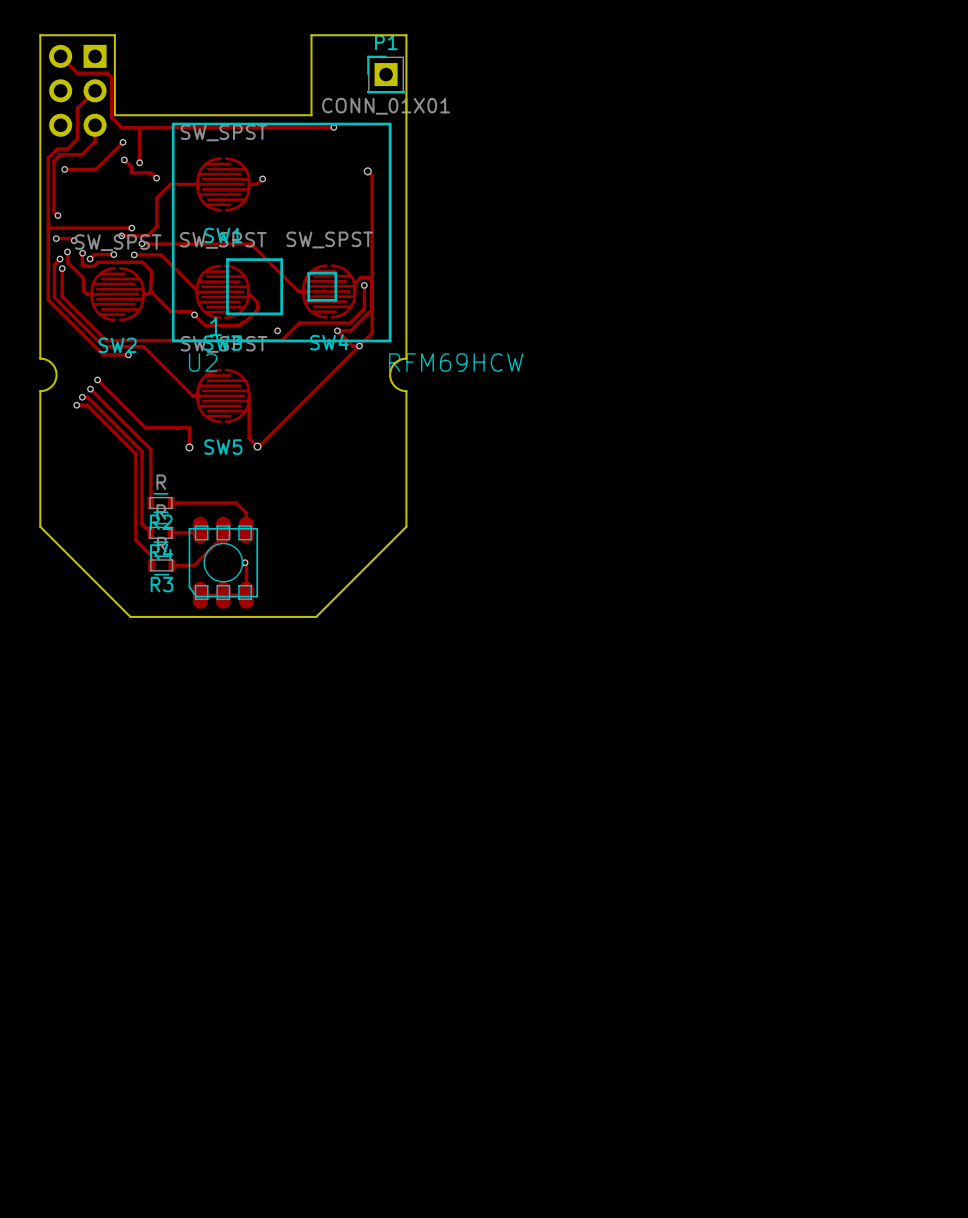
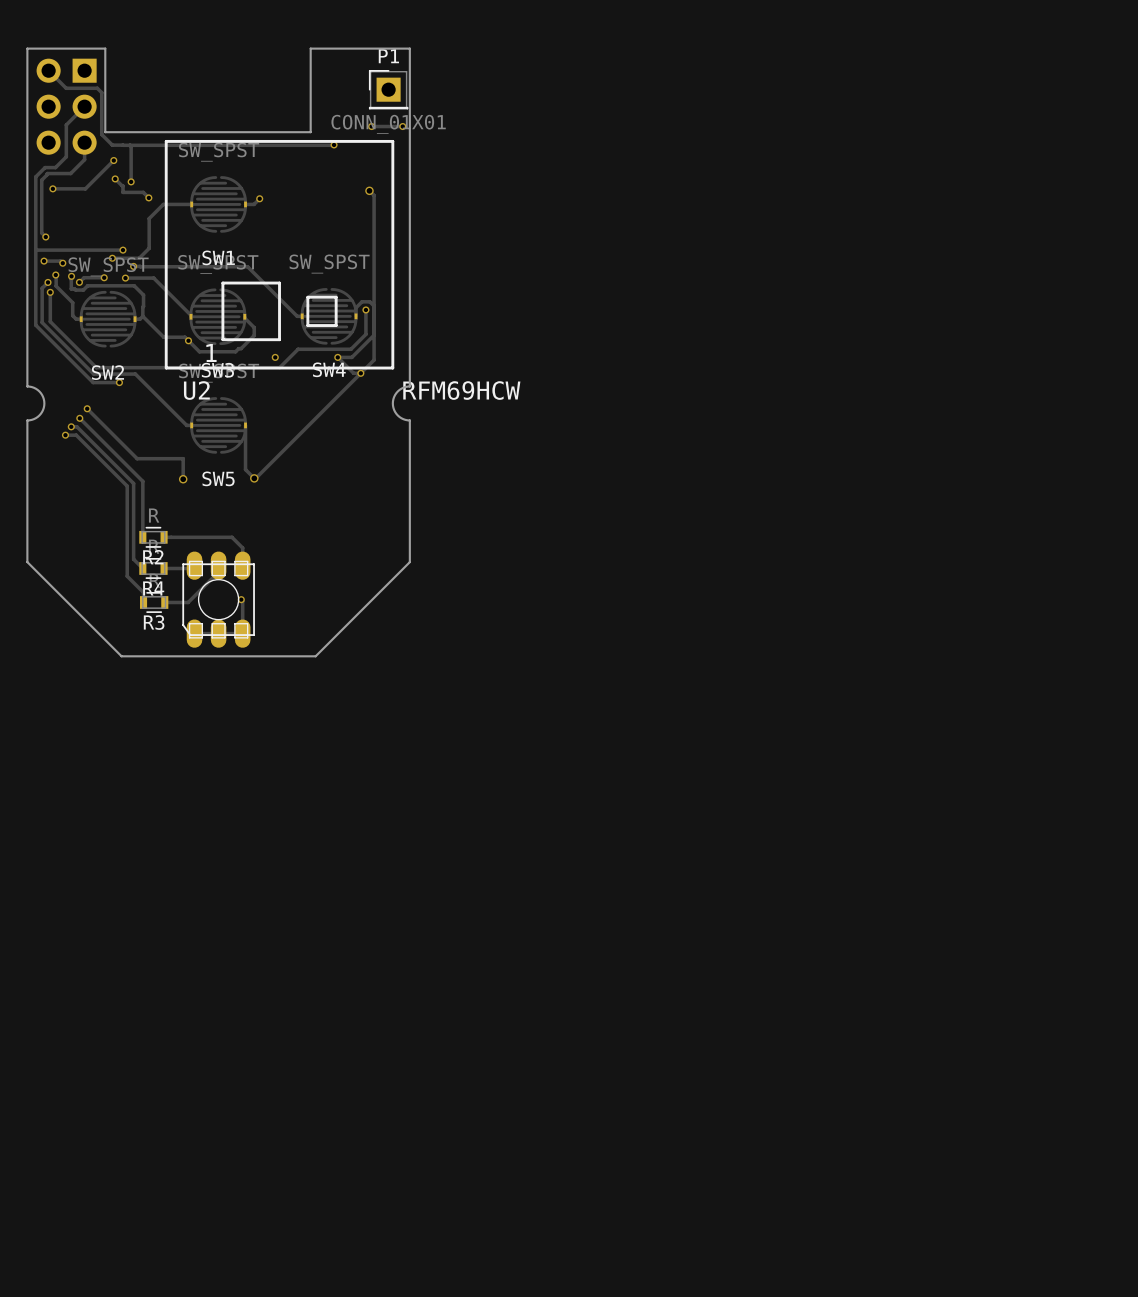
track: none -> (371, 126) (402, 126)
via: none -> (371, 126)
via: none -> (402, 126)

